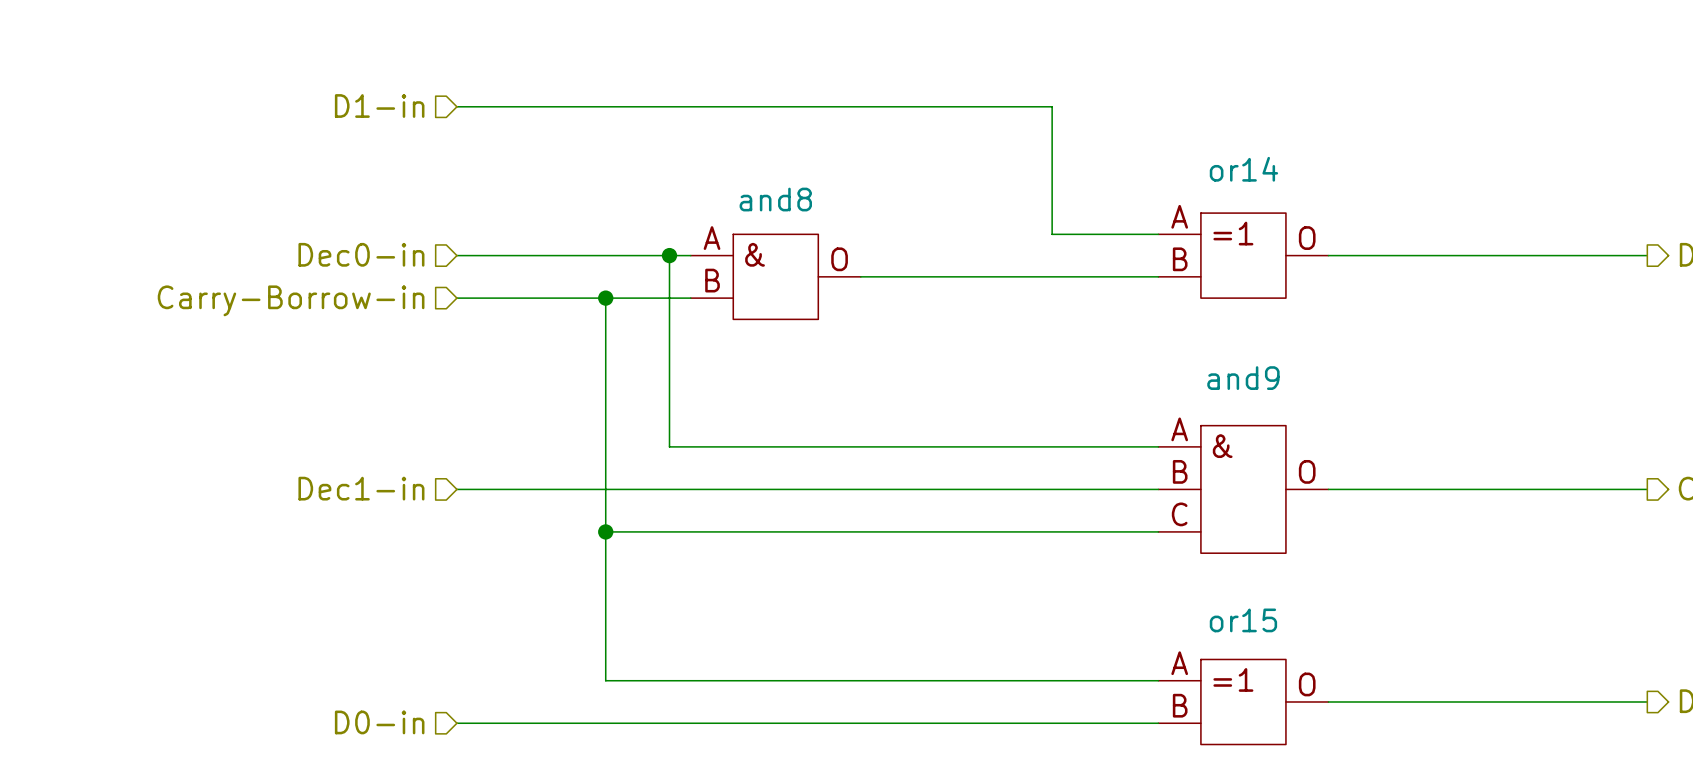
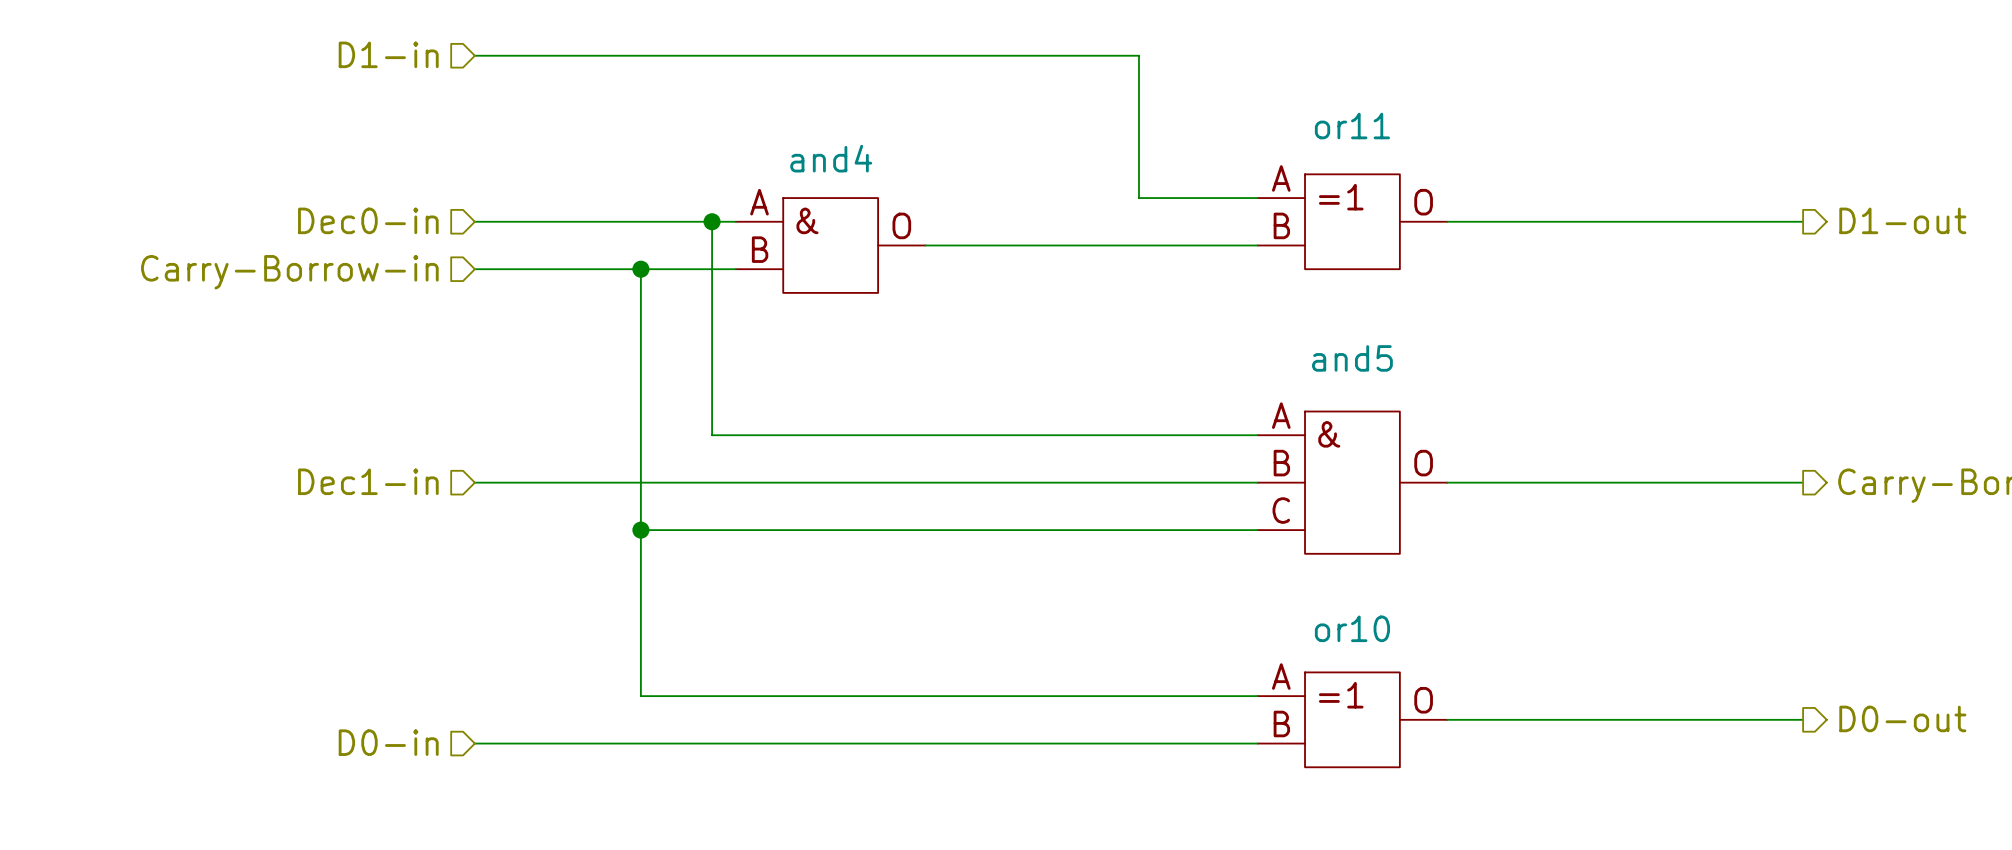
or14 name: or14 (1243, 169) -> or11 (1352, 126)
and8 name: and8 (775, 199) -> and4 (831, 158)
and9 name: and9 (1243, 378) -> and5 (1352, 358)
or15 name: or15 (1243, 620) -> or10 (1352, 628)

